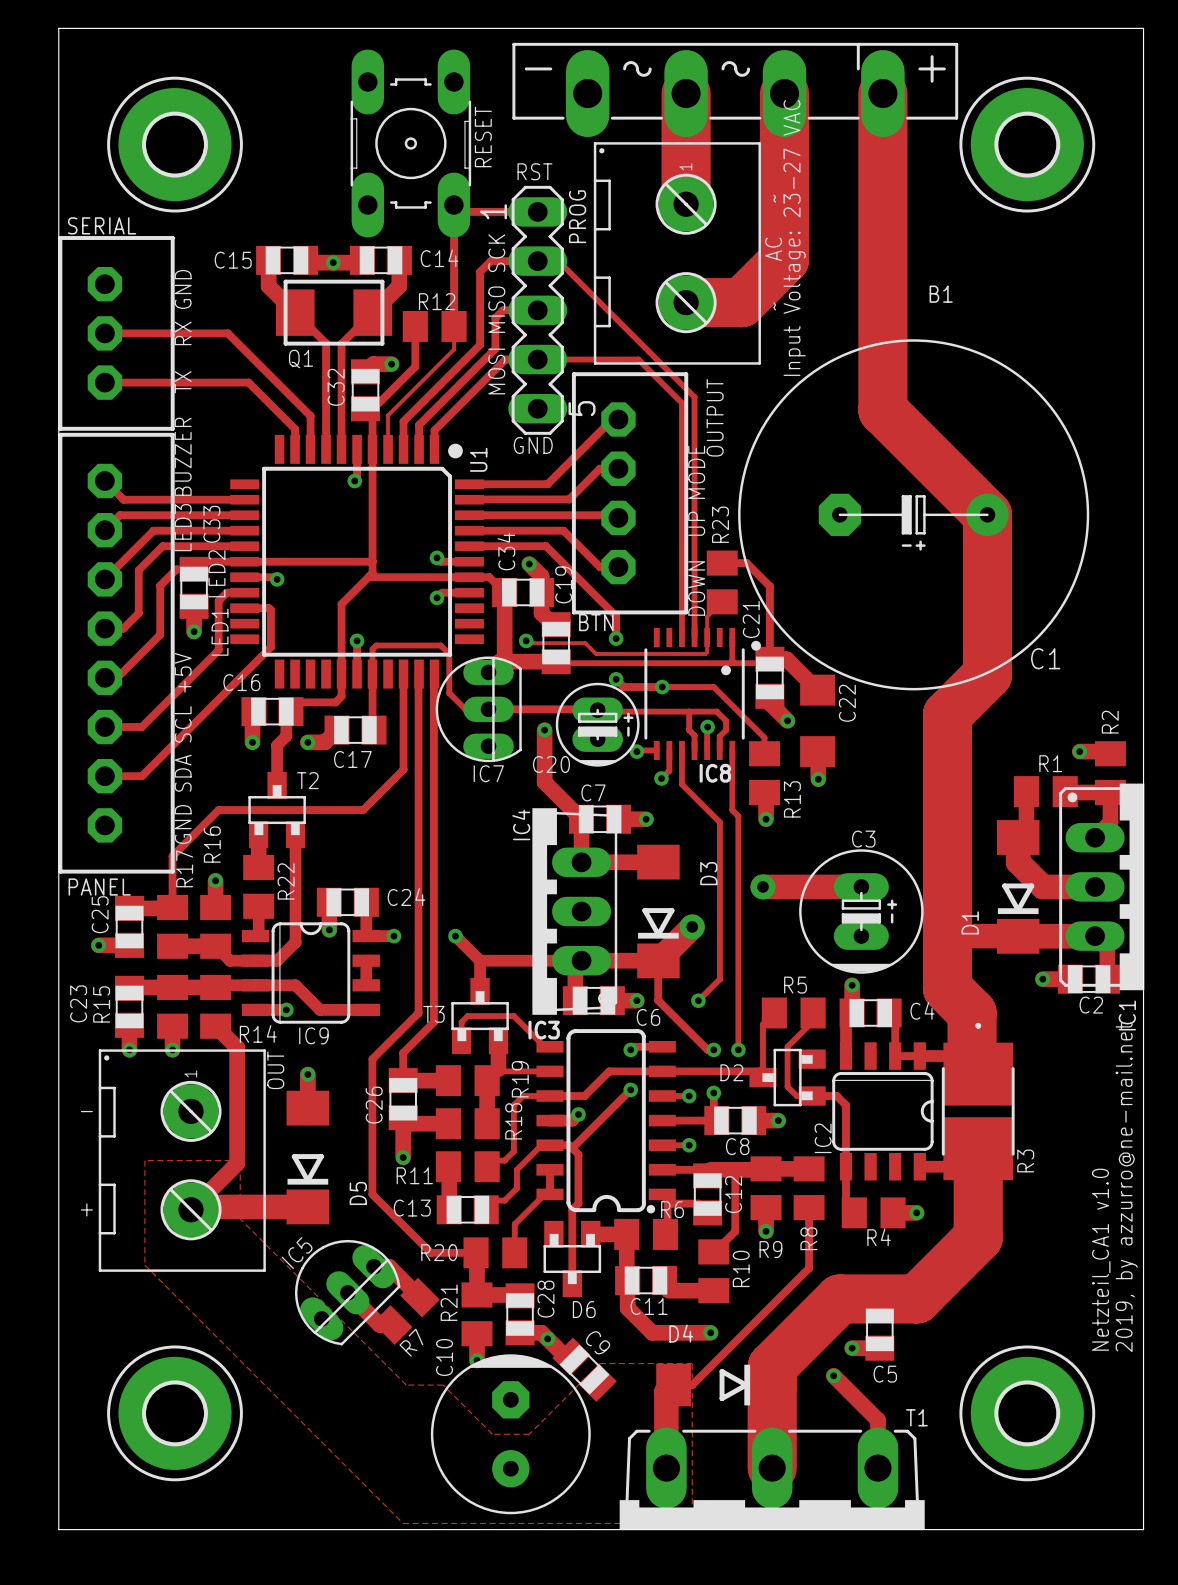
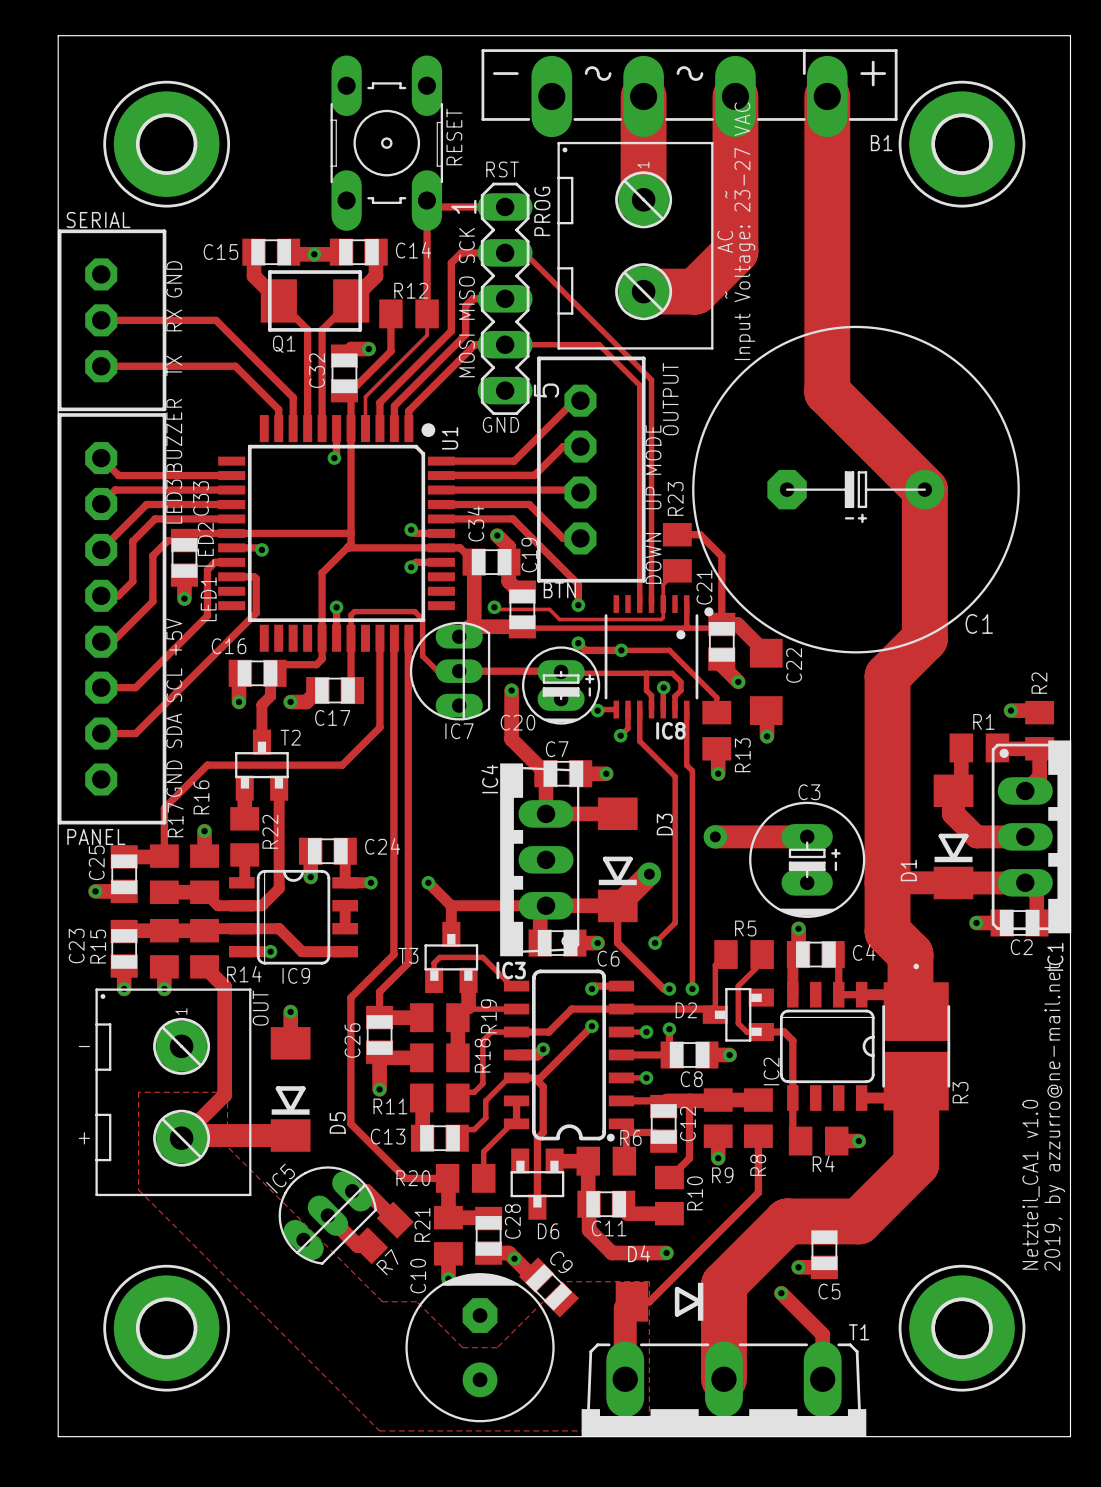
B1 name position: B1 (941, 294) -> B1 (881, 143)

